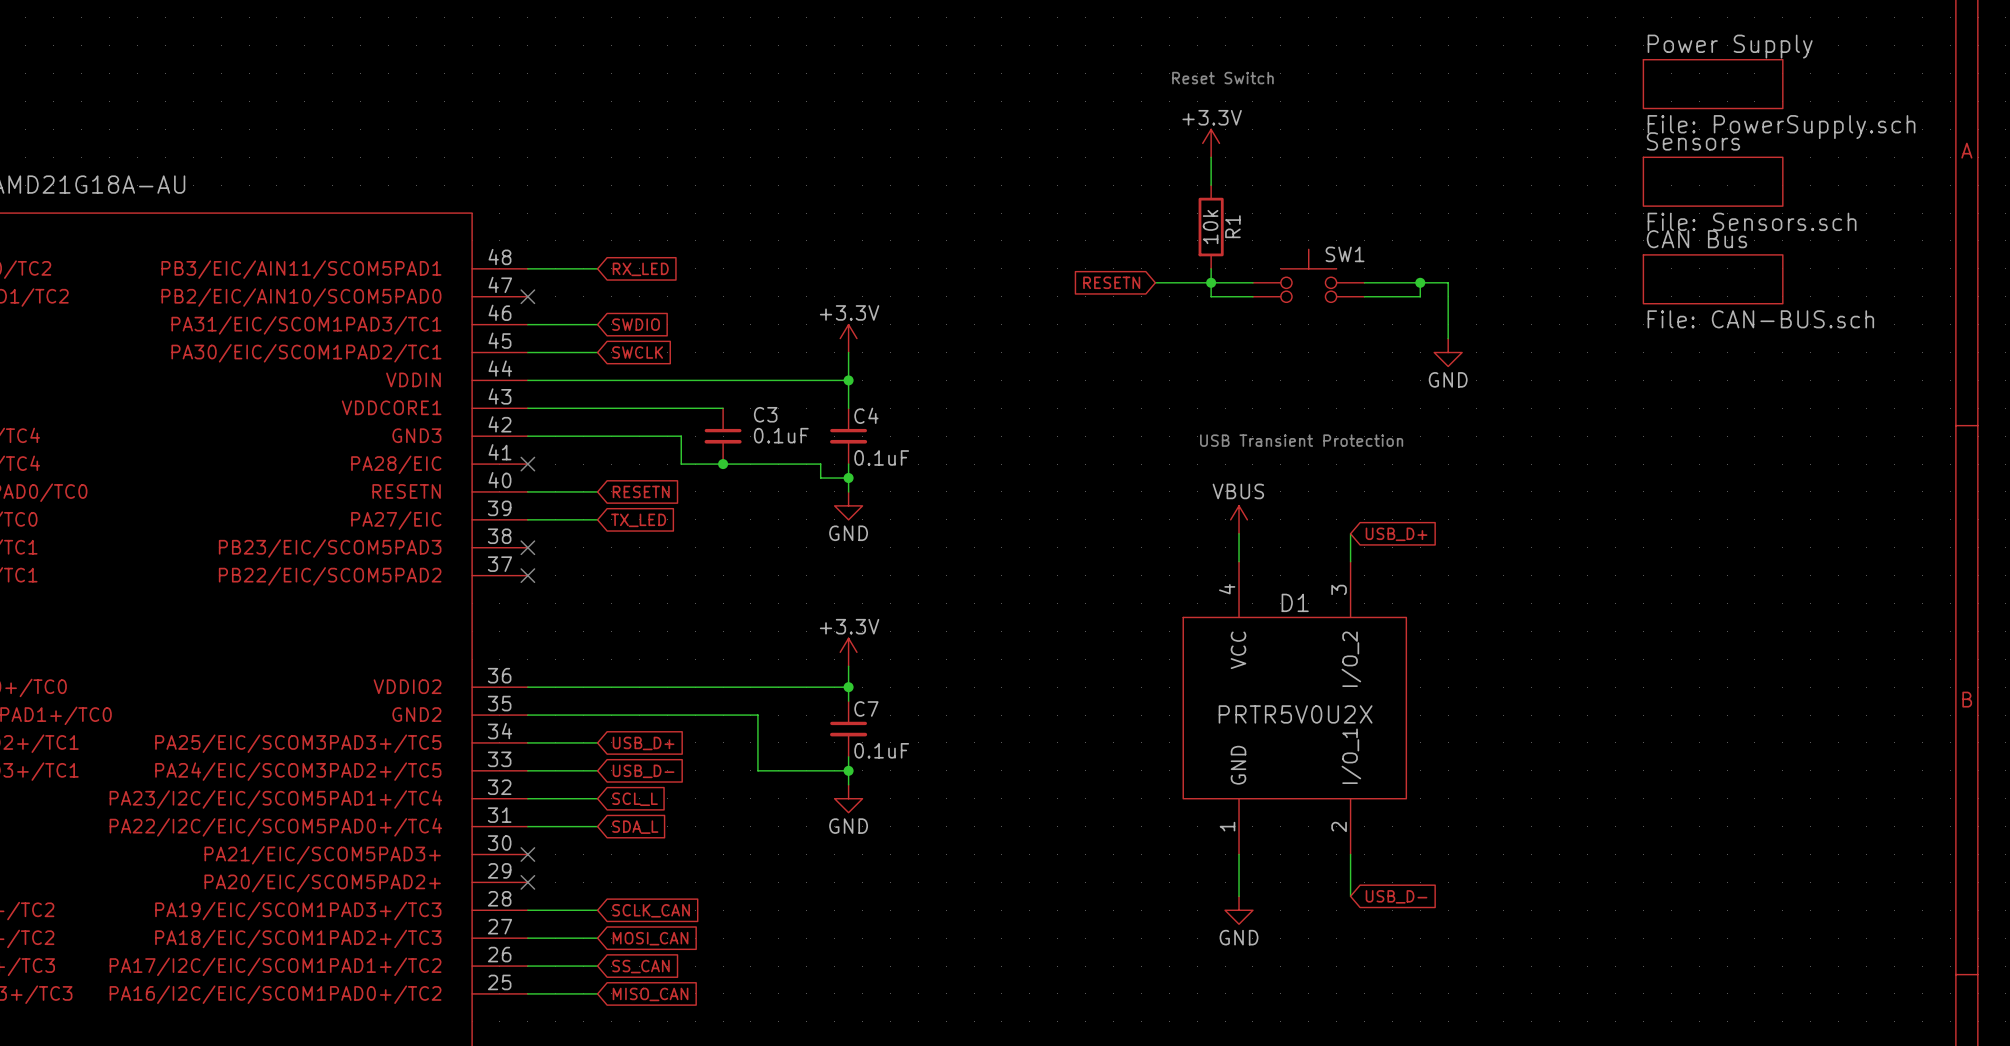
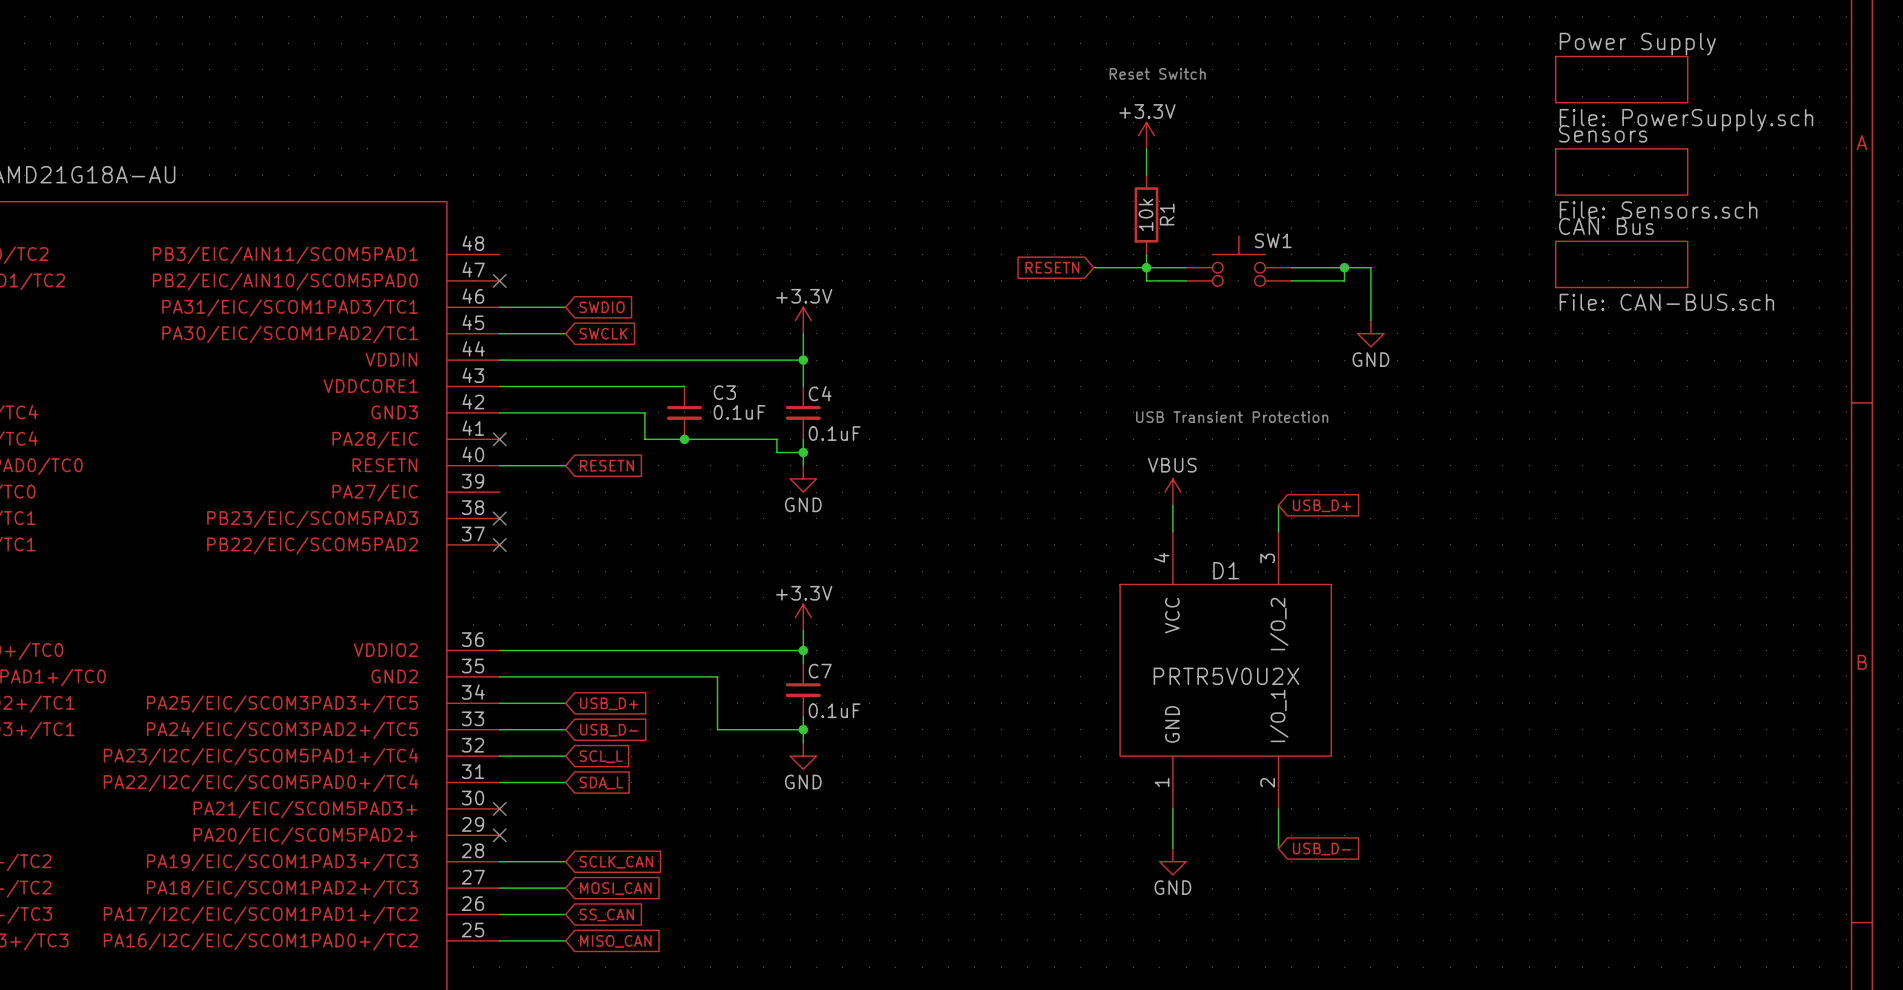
wire: (527, 268) (597, 268) -> none
global label: RX_LED (640, 269) -> none
wire: (527, 519) (597, 519) -> none
global label: TX_LED (638, 520) -> none

